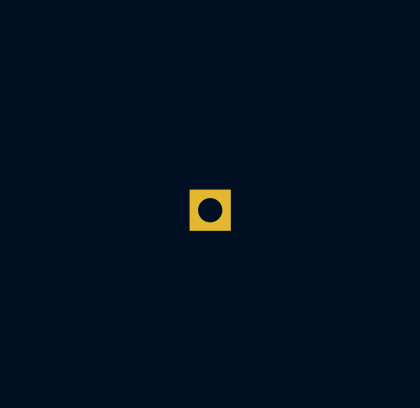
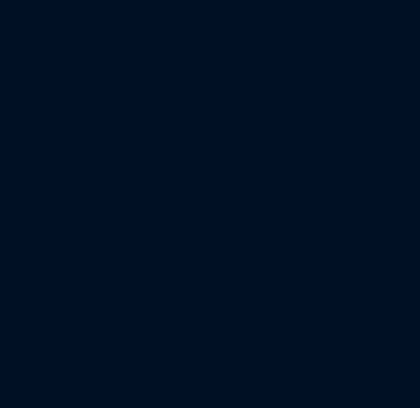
part: (210, 210) -> none

